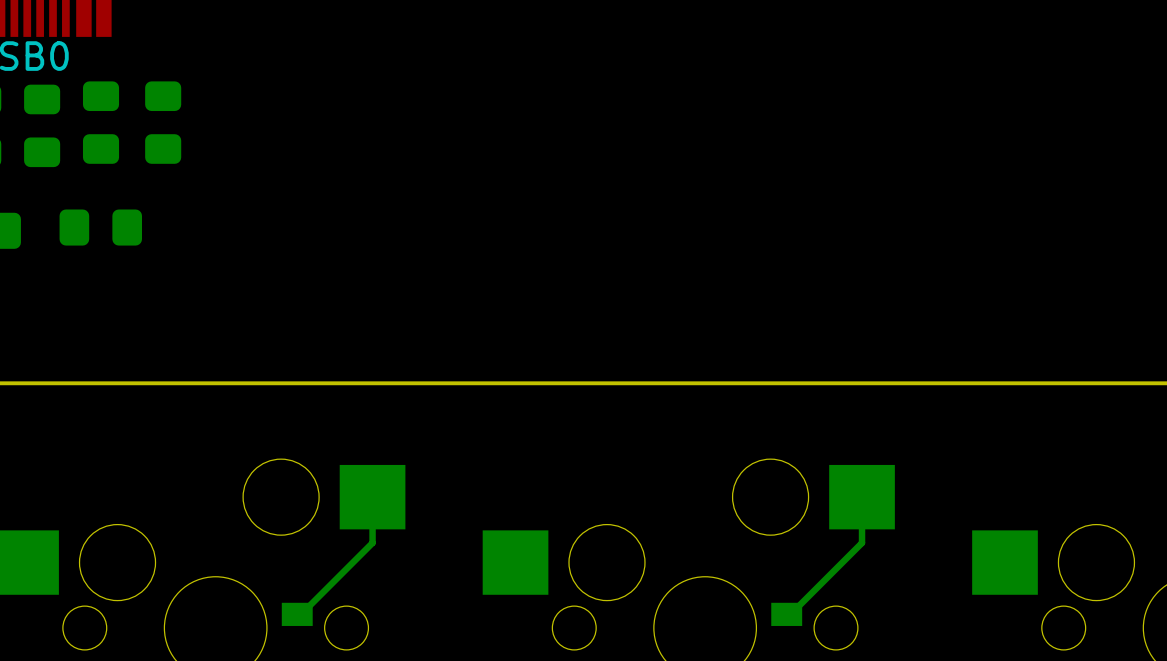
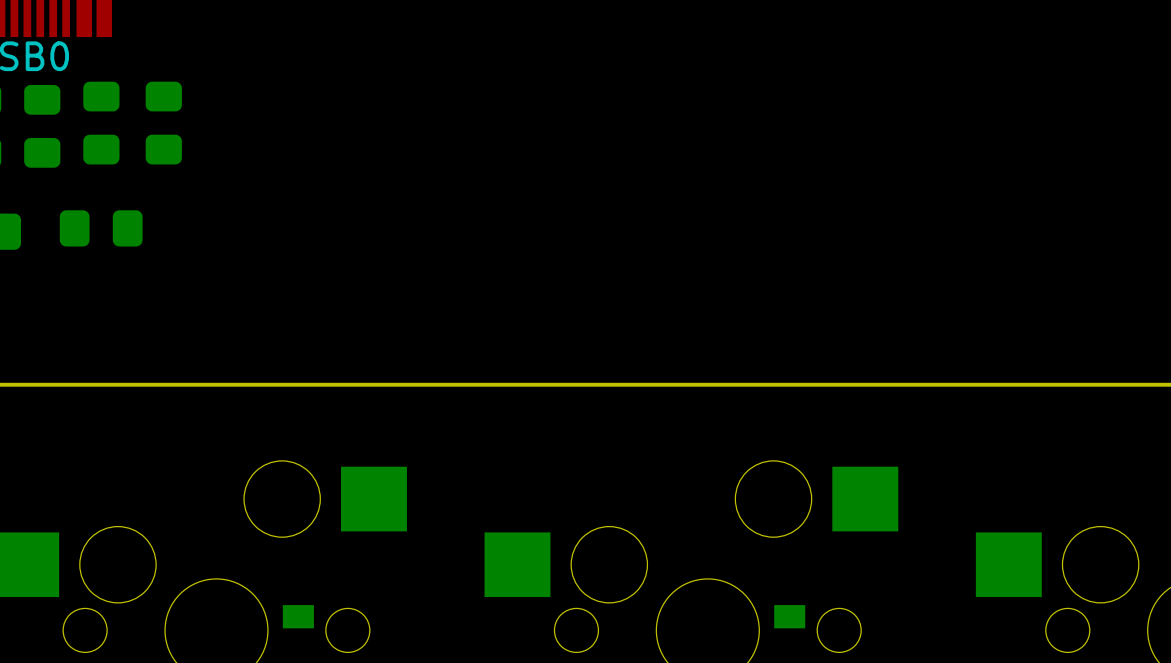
bottom track: (372, 497) (372, 542) (301, 614) (297, 614) -> none
bottom track: (862, 497) (862, 542) (790, 614) (786, 614) -> none

